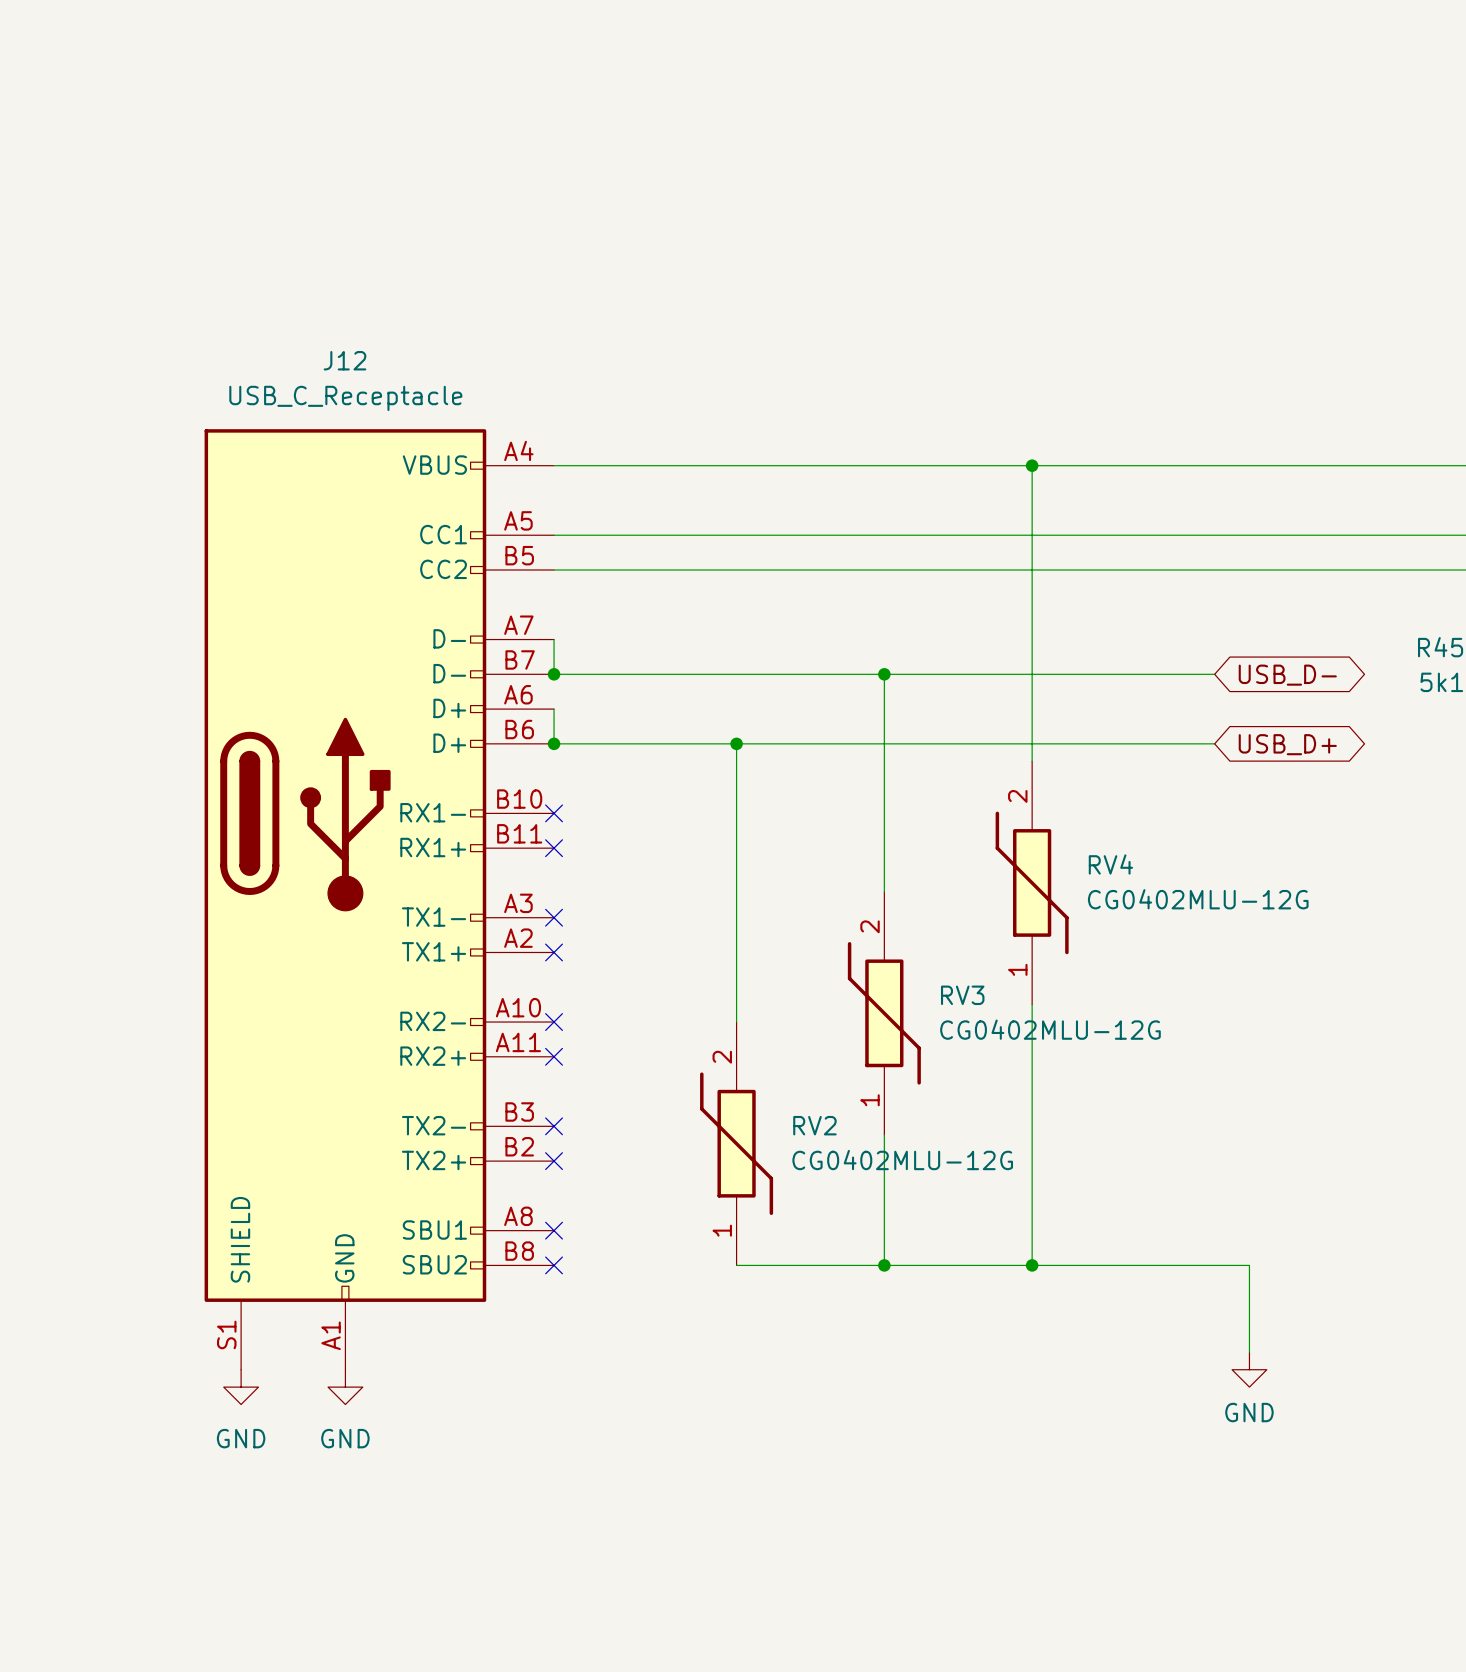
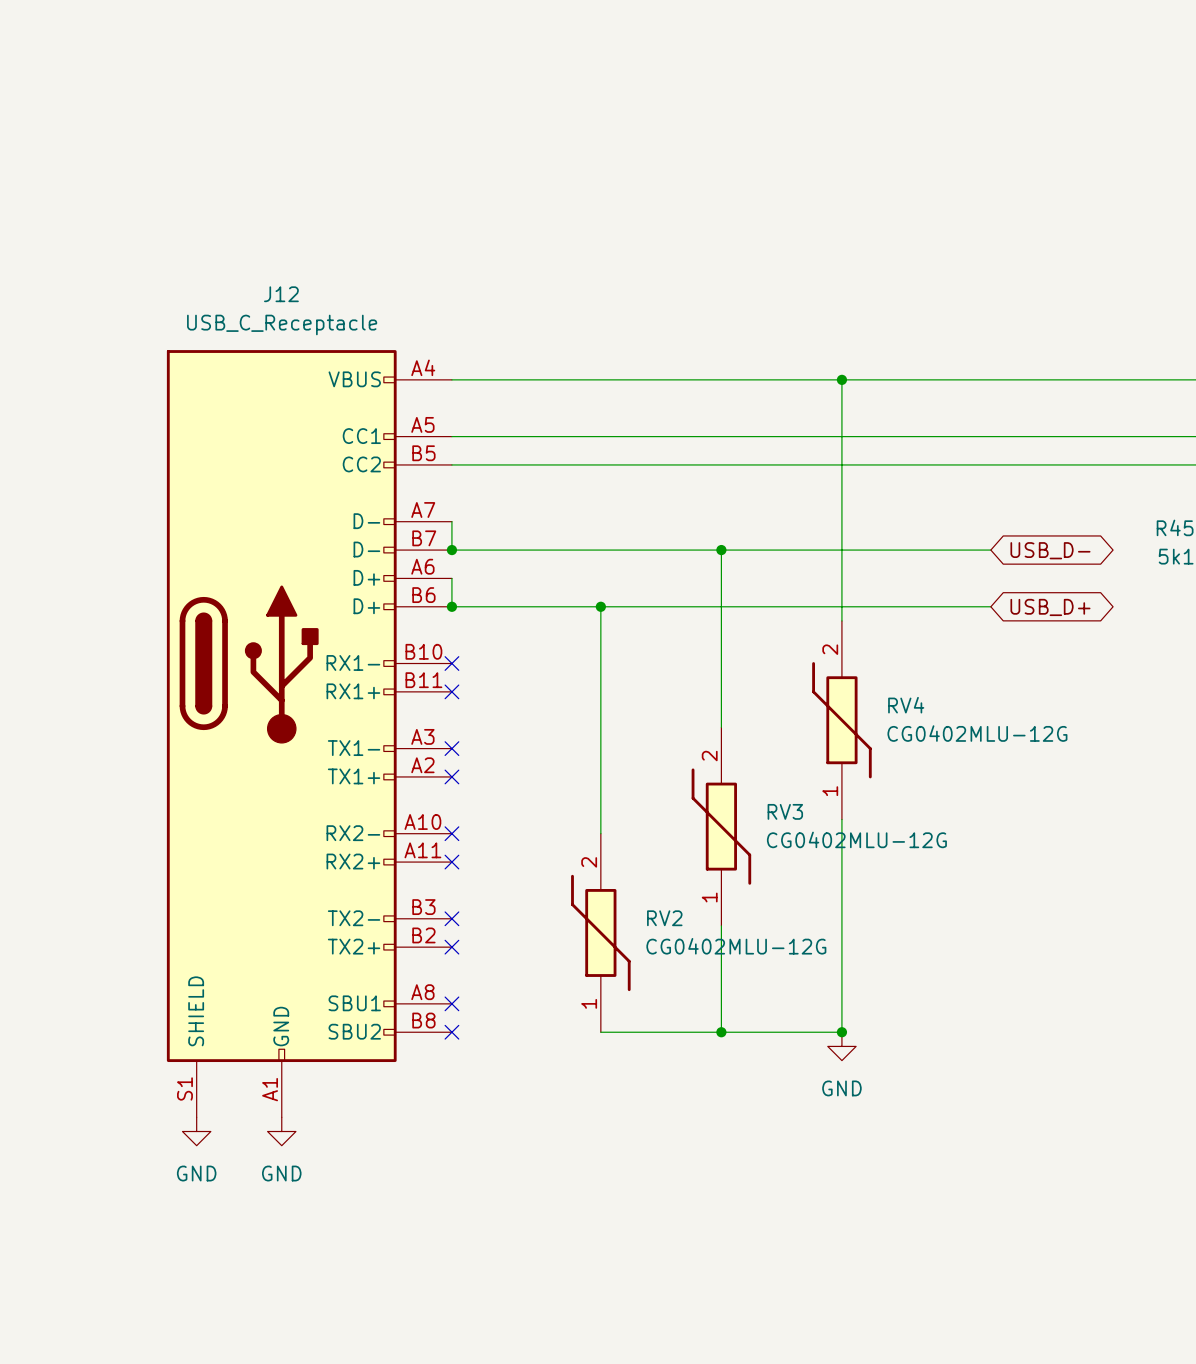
wire: (1032, 1265) (1249, 1265) (1249, 1352) -> none
power symbol position: GND (1249, 1369) -> GND (841, 1046)
power symbol text position: GND (1249, 1412) -> GND (841, 1088)

